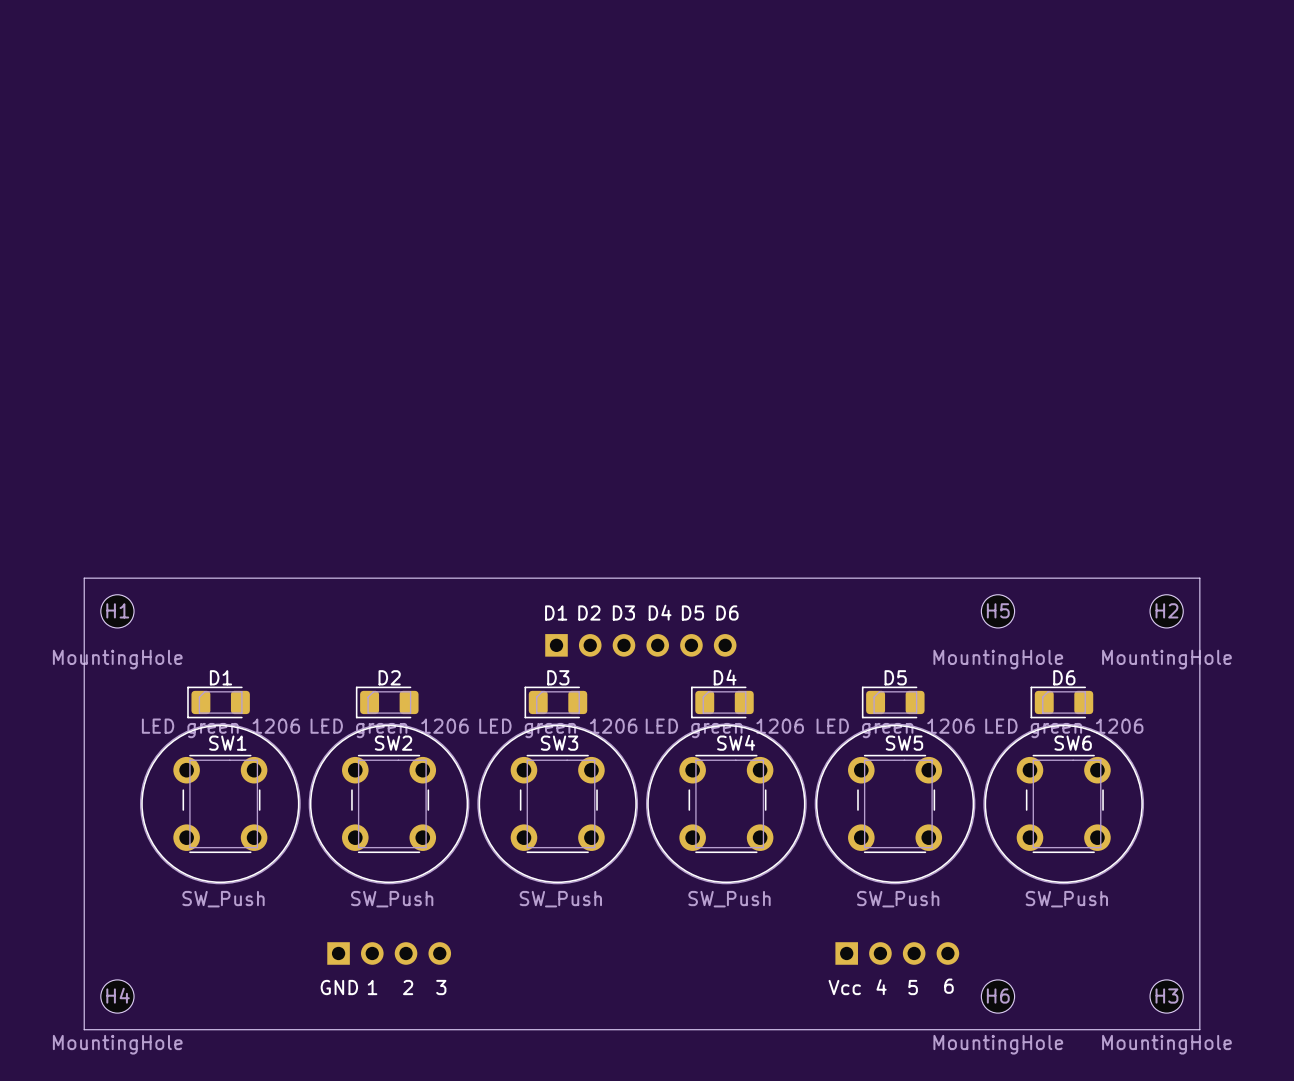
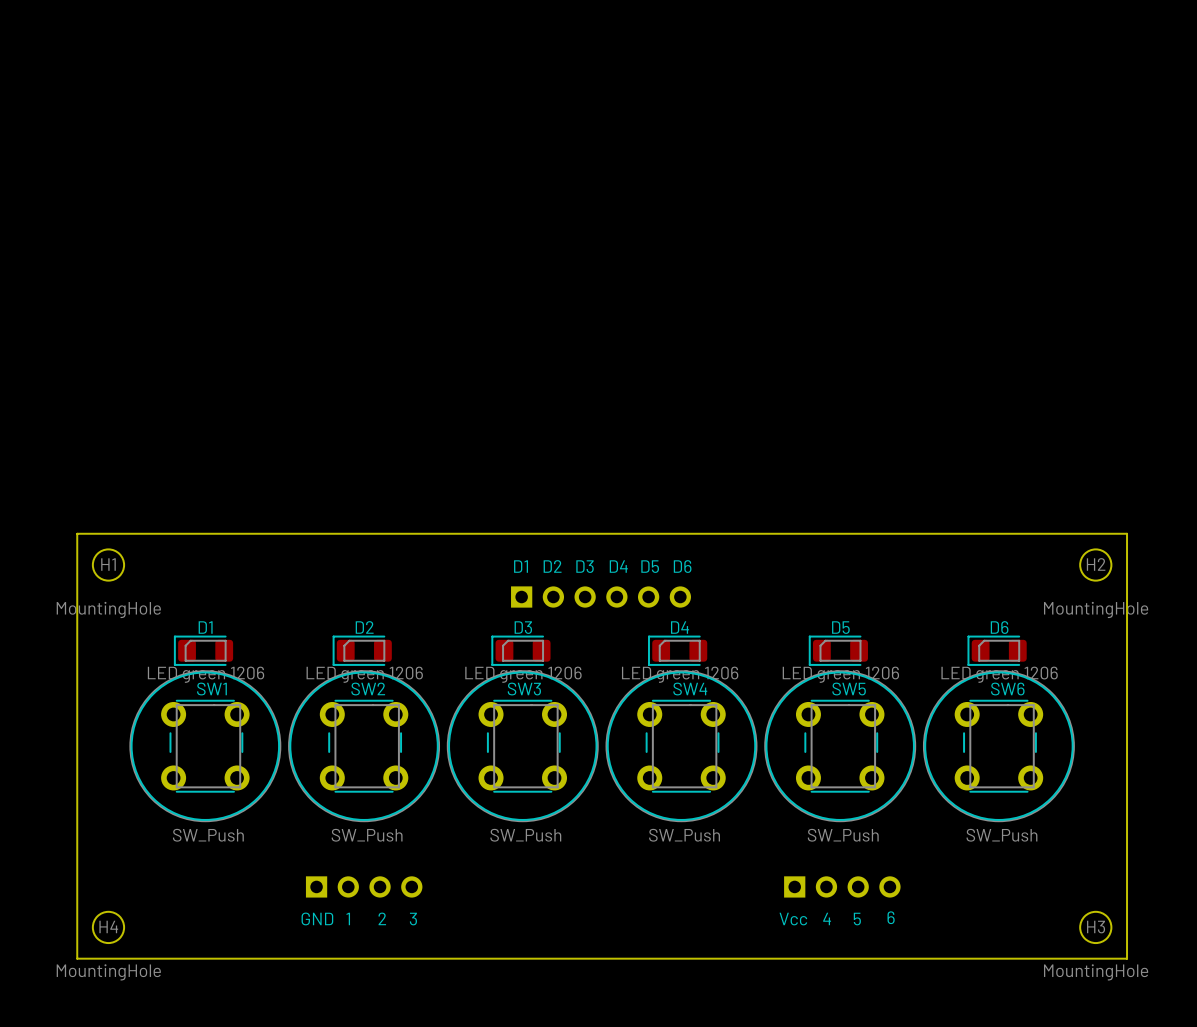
H5: MountingHole (997, 611) -> none
H6: MountingHole (997, 996) -> none

